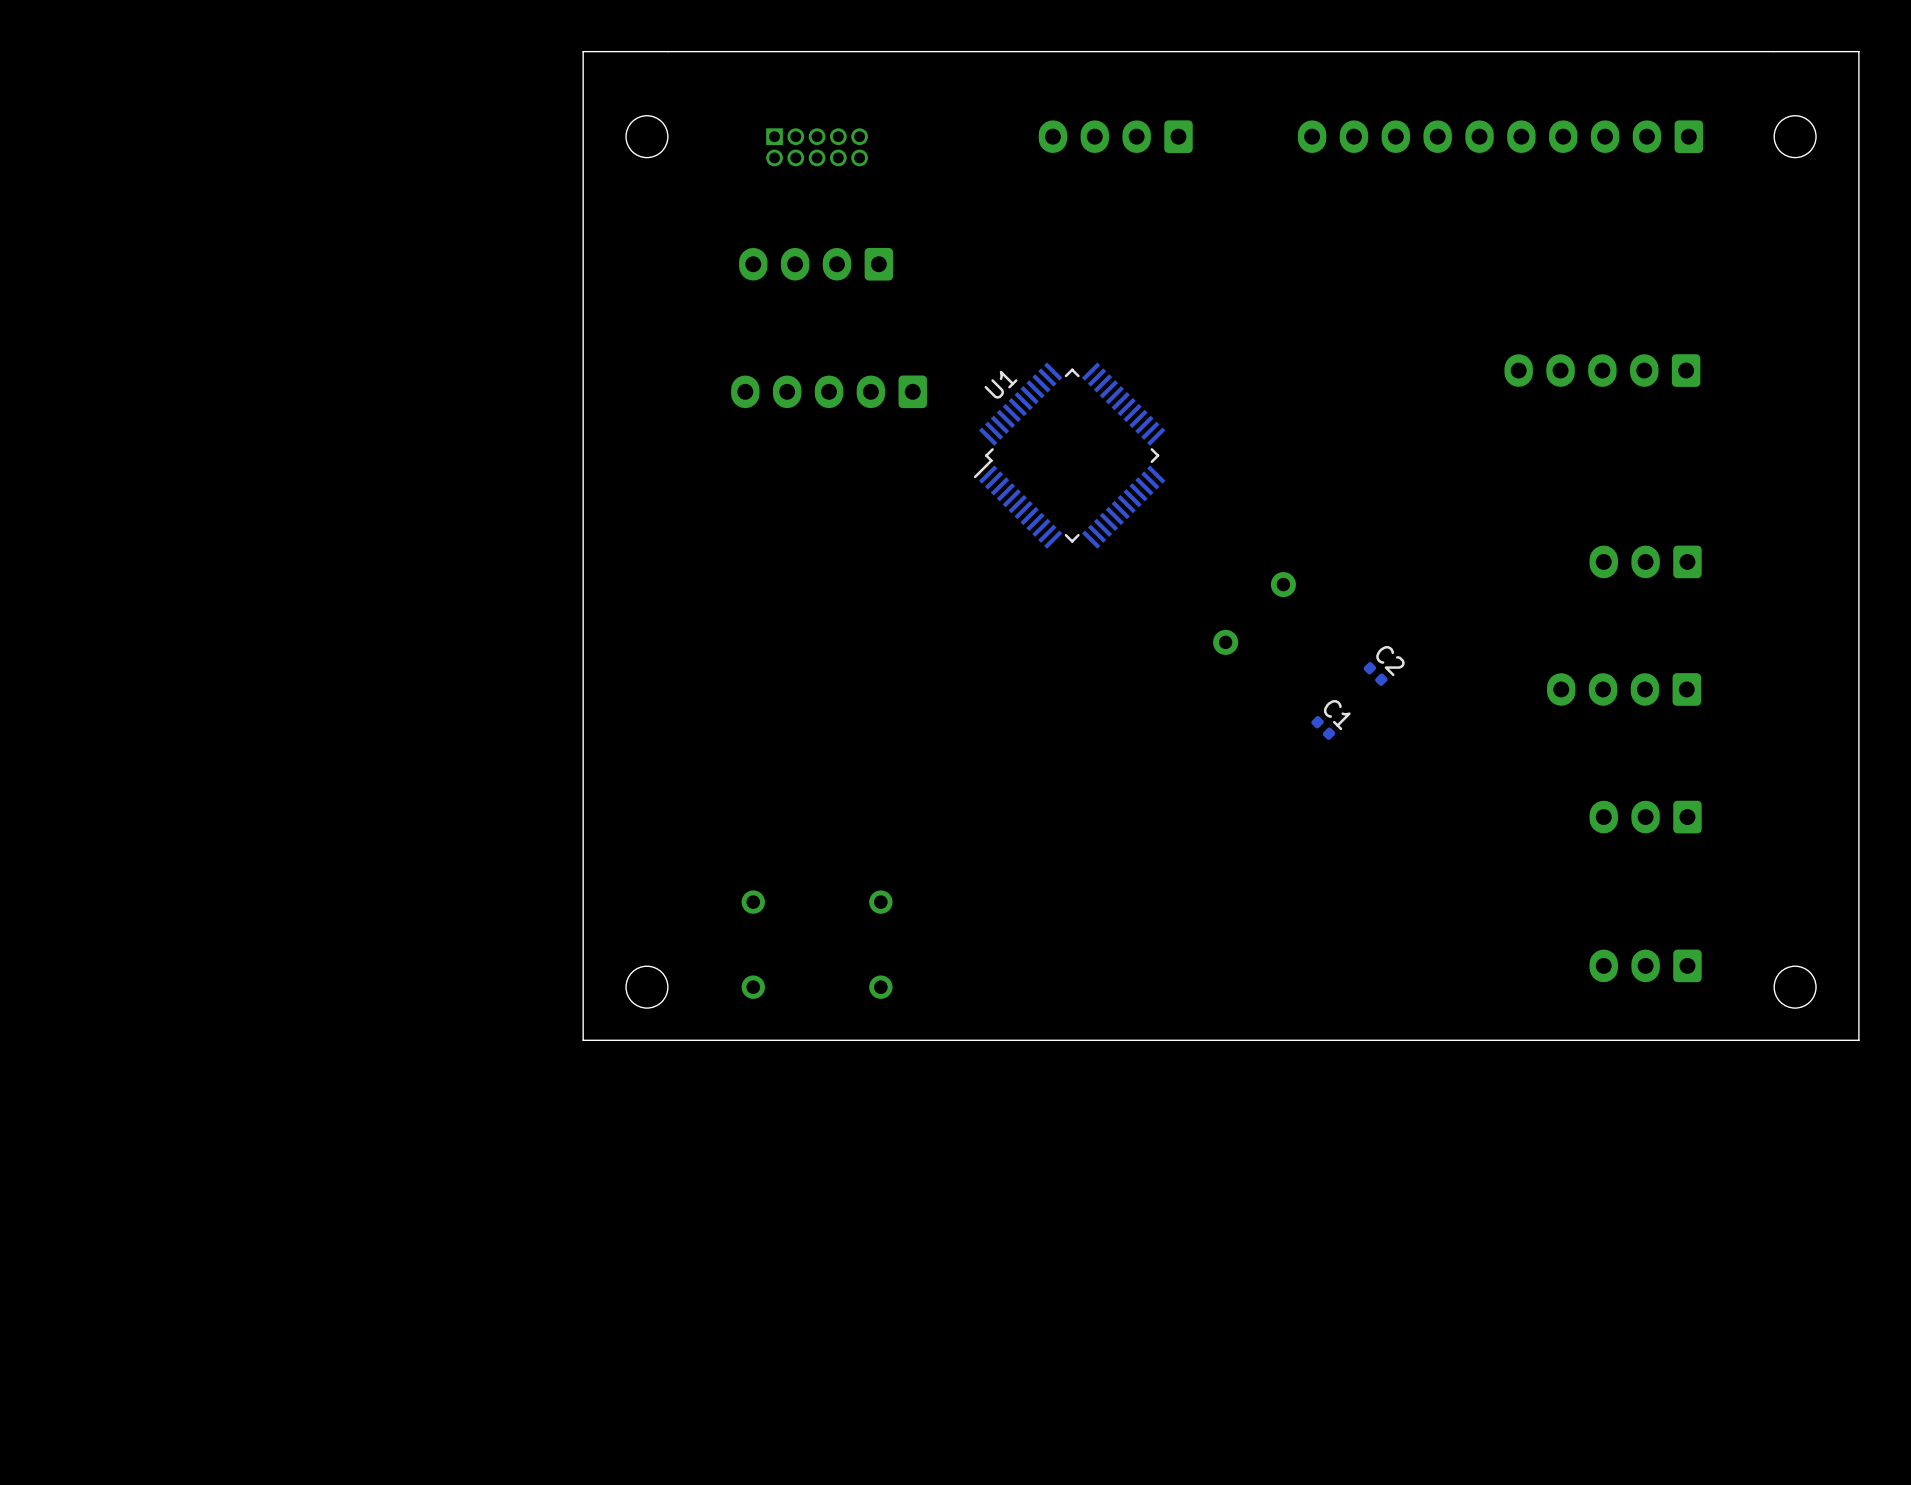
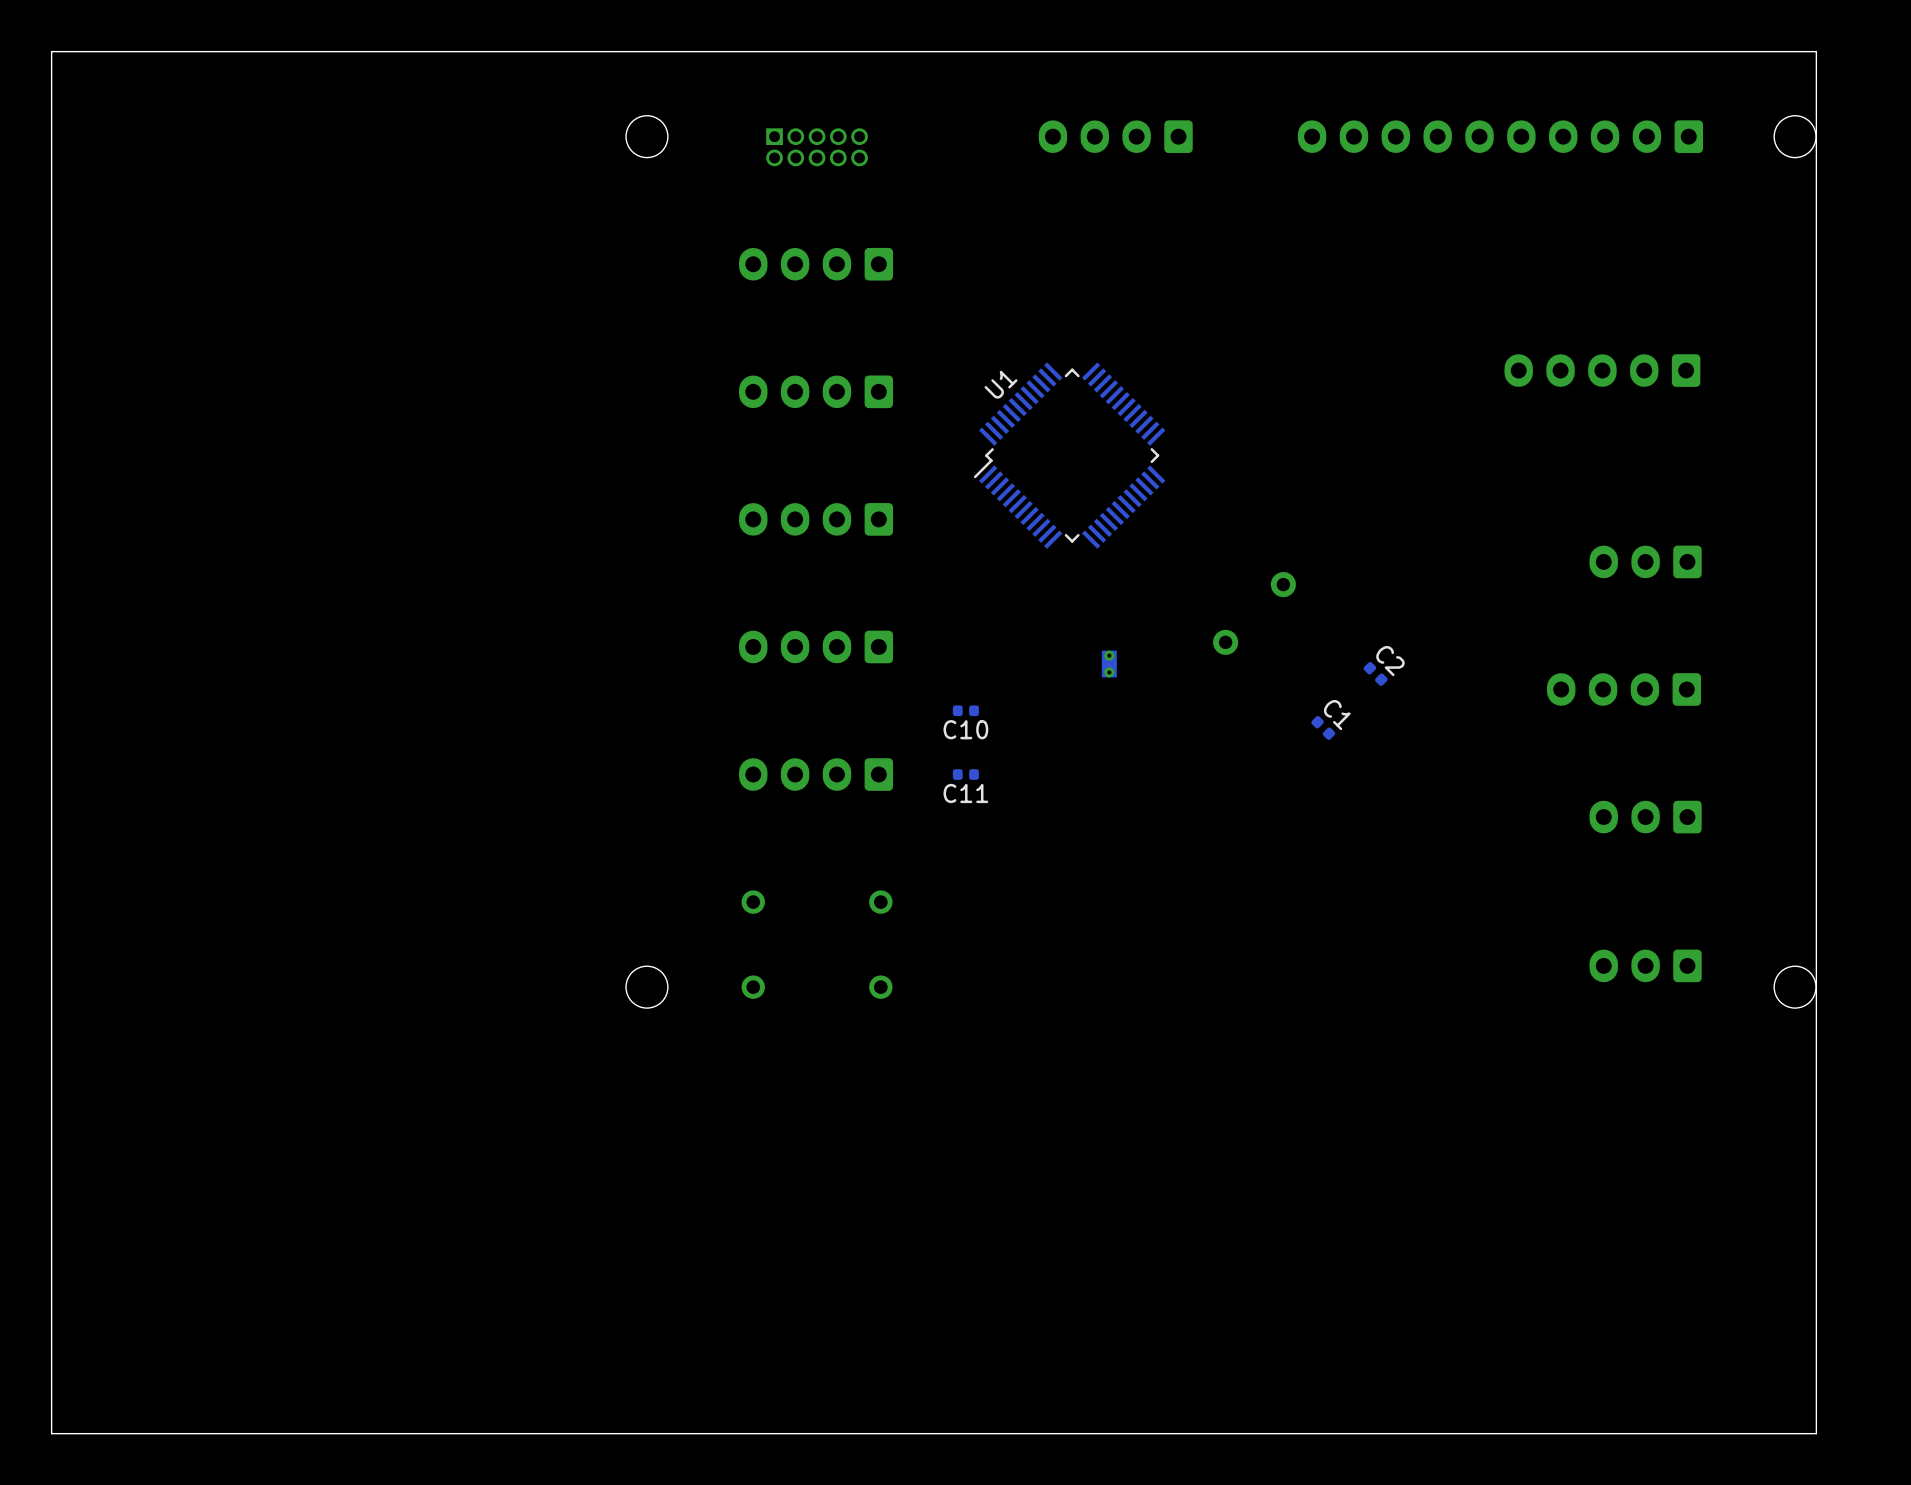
board edge: (1816, 51) (1858, 51) (1858, 1040) (583, 1040) (583, 51) -> (1816, 51) (1816, 1433) (51, 1433) (51, 51) (583, 51)
part footprint: [731, 375, 927, 409] -> [739, 375, 894, 409]
part: none -> (816, 519)
part: none -> (816, 646)
part: none -> (1109, 664)
C10: none -> (965, 710)
part: none -> (816, 774)
C11: none -> (965, 774)

